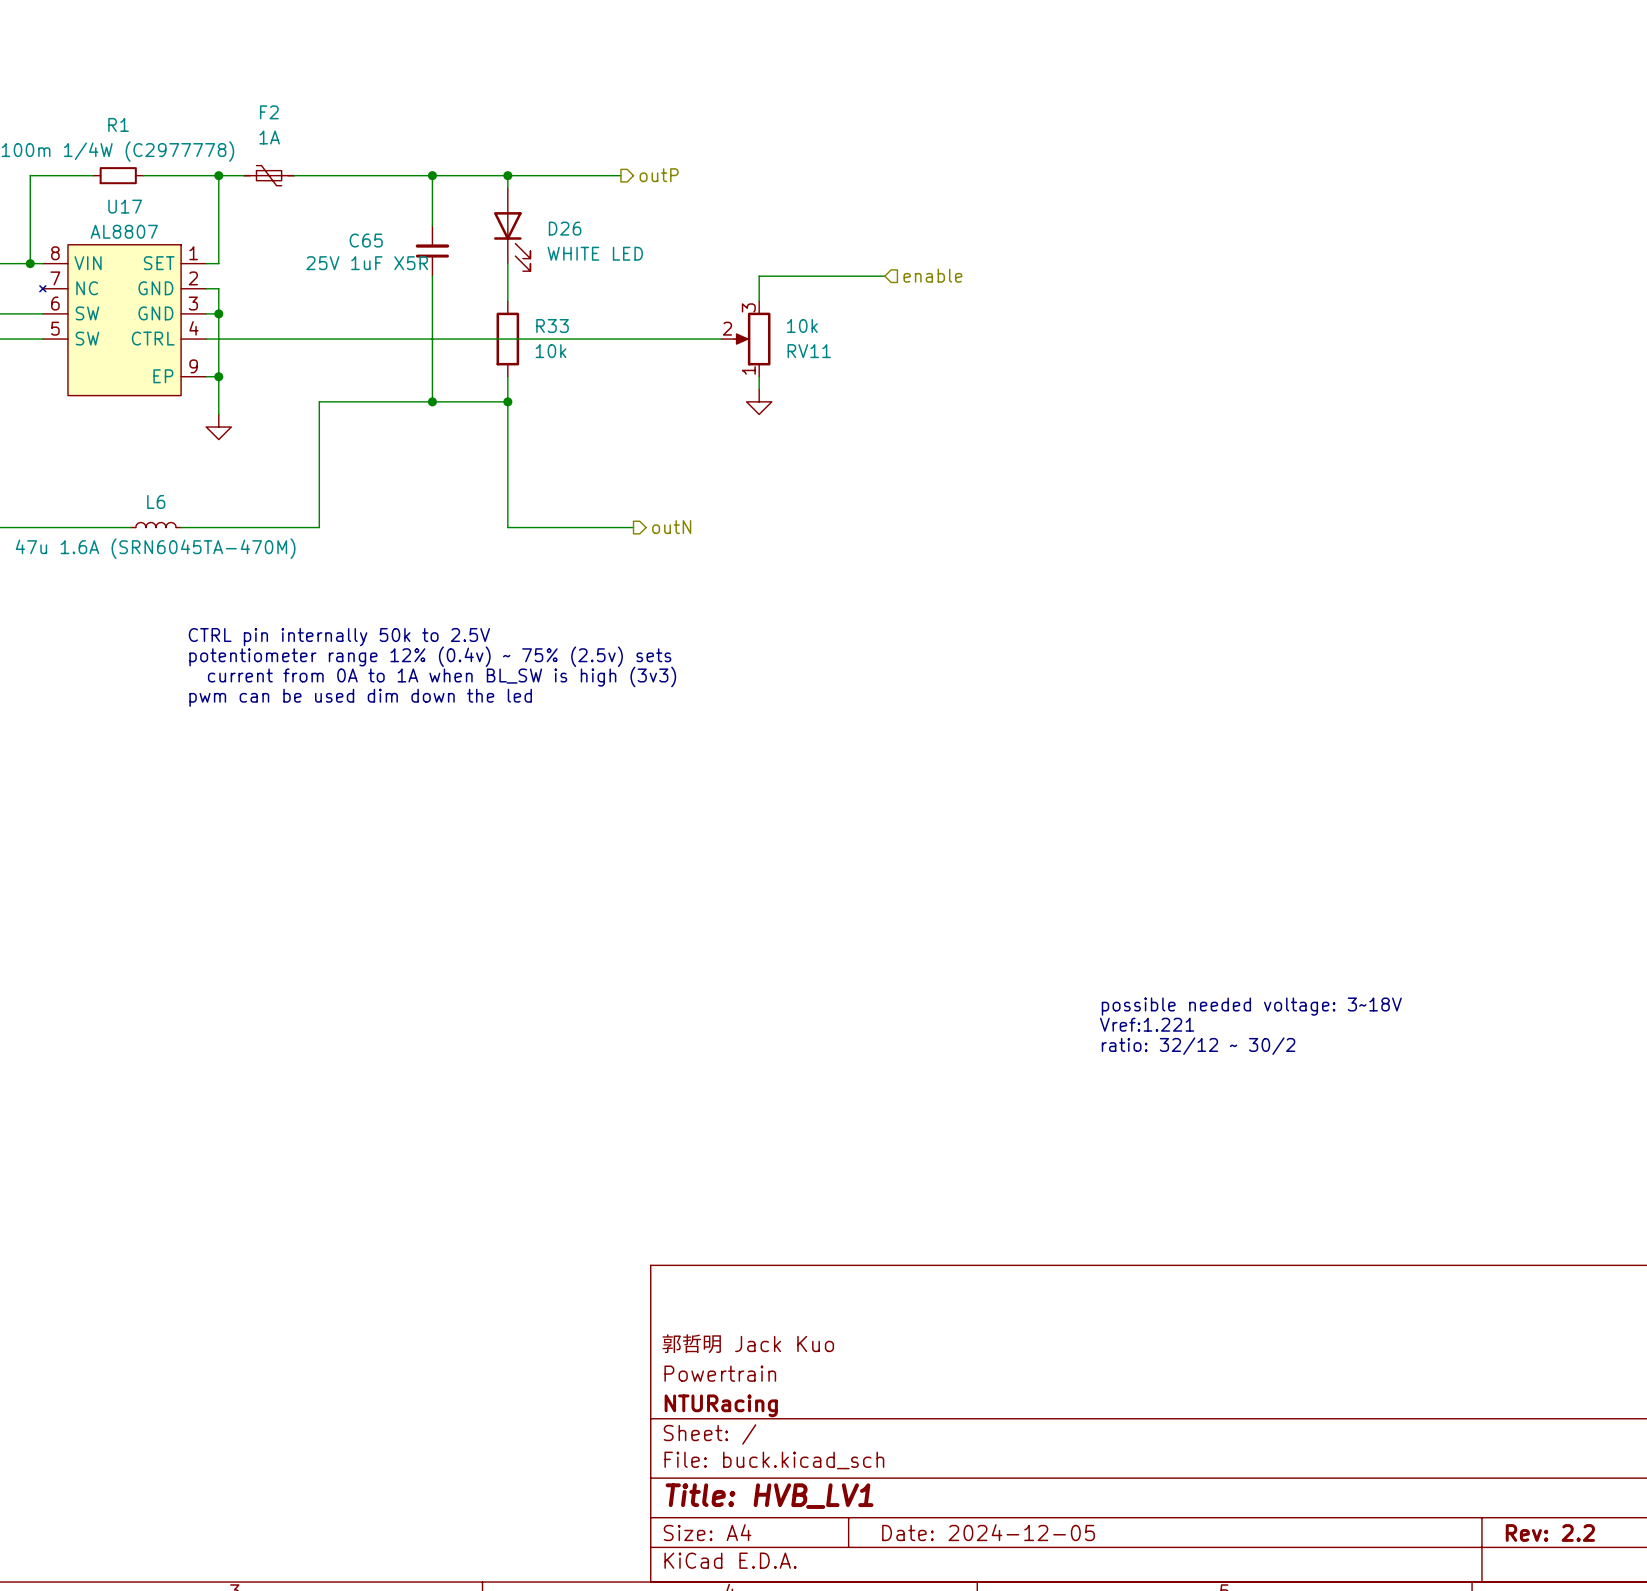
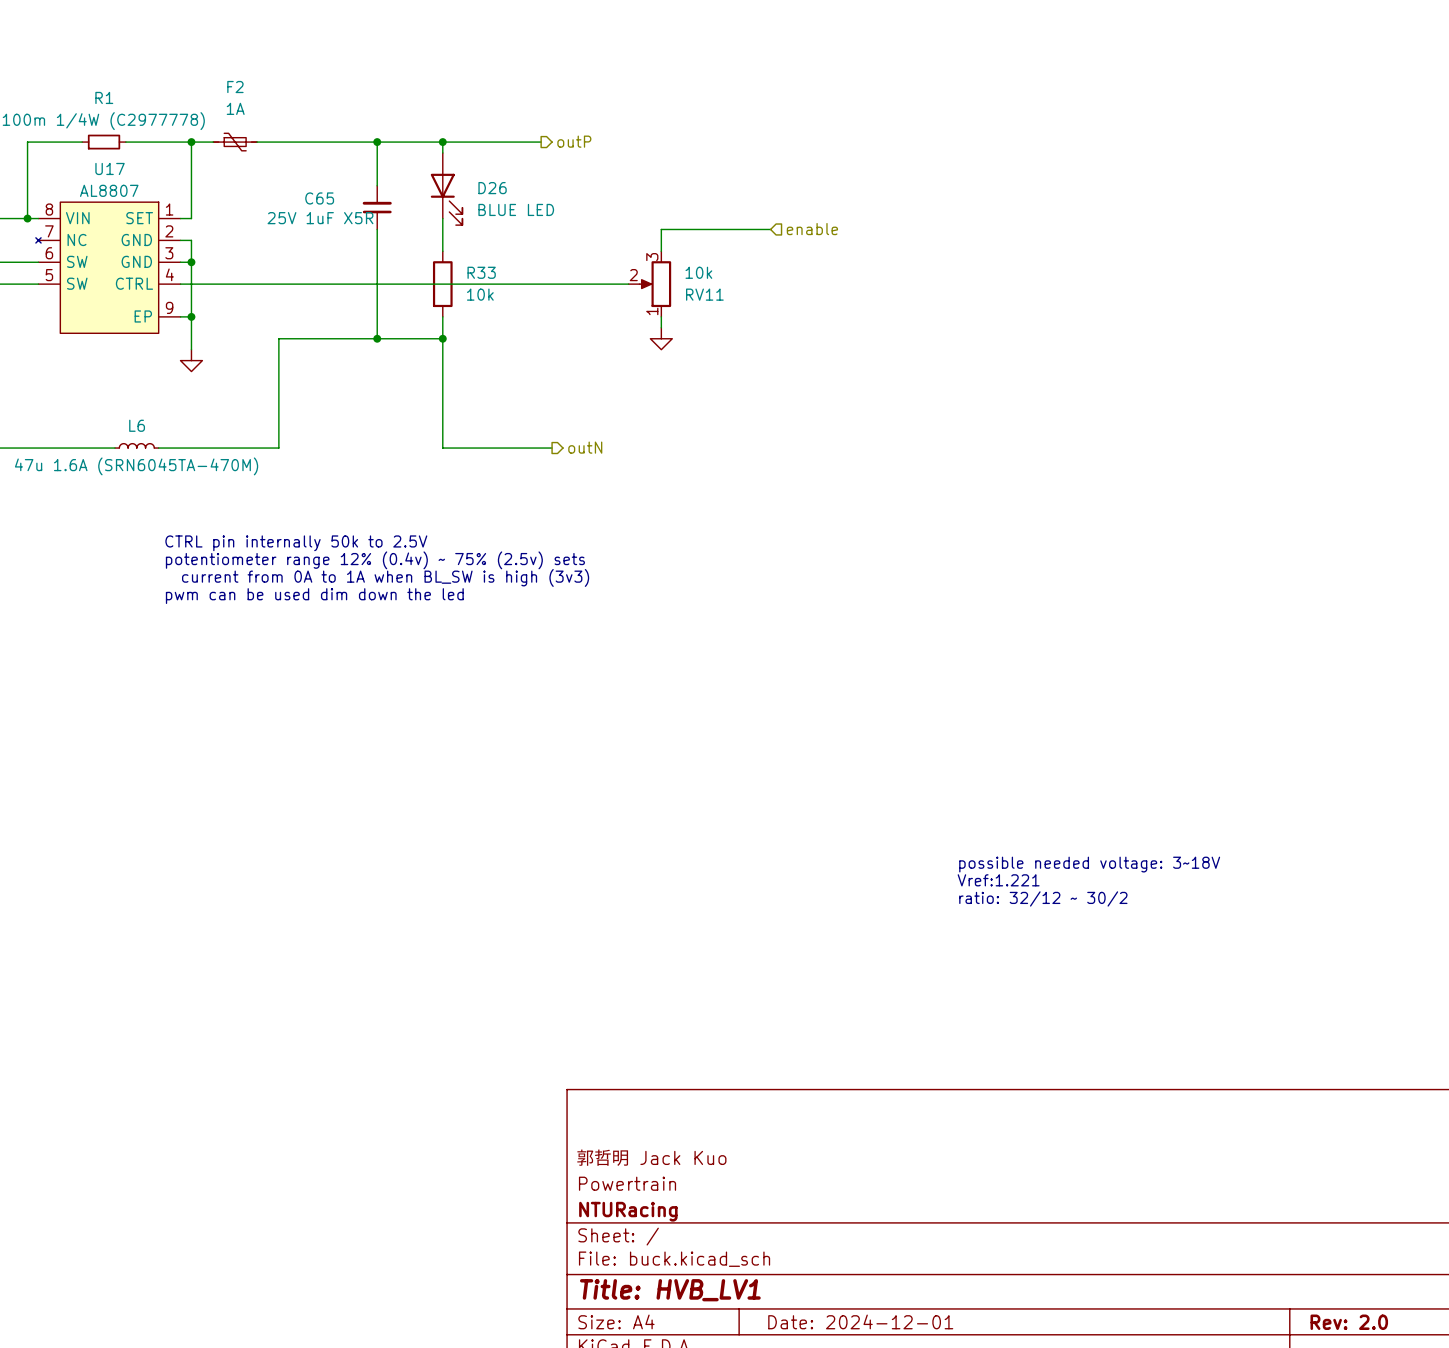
D26 value: WHITE LED (595, 253) -> BLUE LED (516, 209)
title block: Date: 2024-12-05 (988, 1532) -> Date: 2024-12-01 (860, 1321)
title block: Rev: 2.2 (1550, 1532) -> Rev: 2.0 (1349, 1322)

